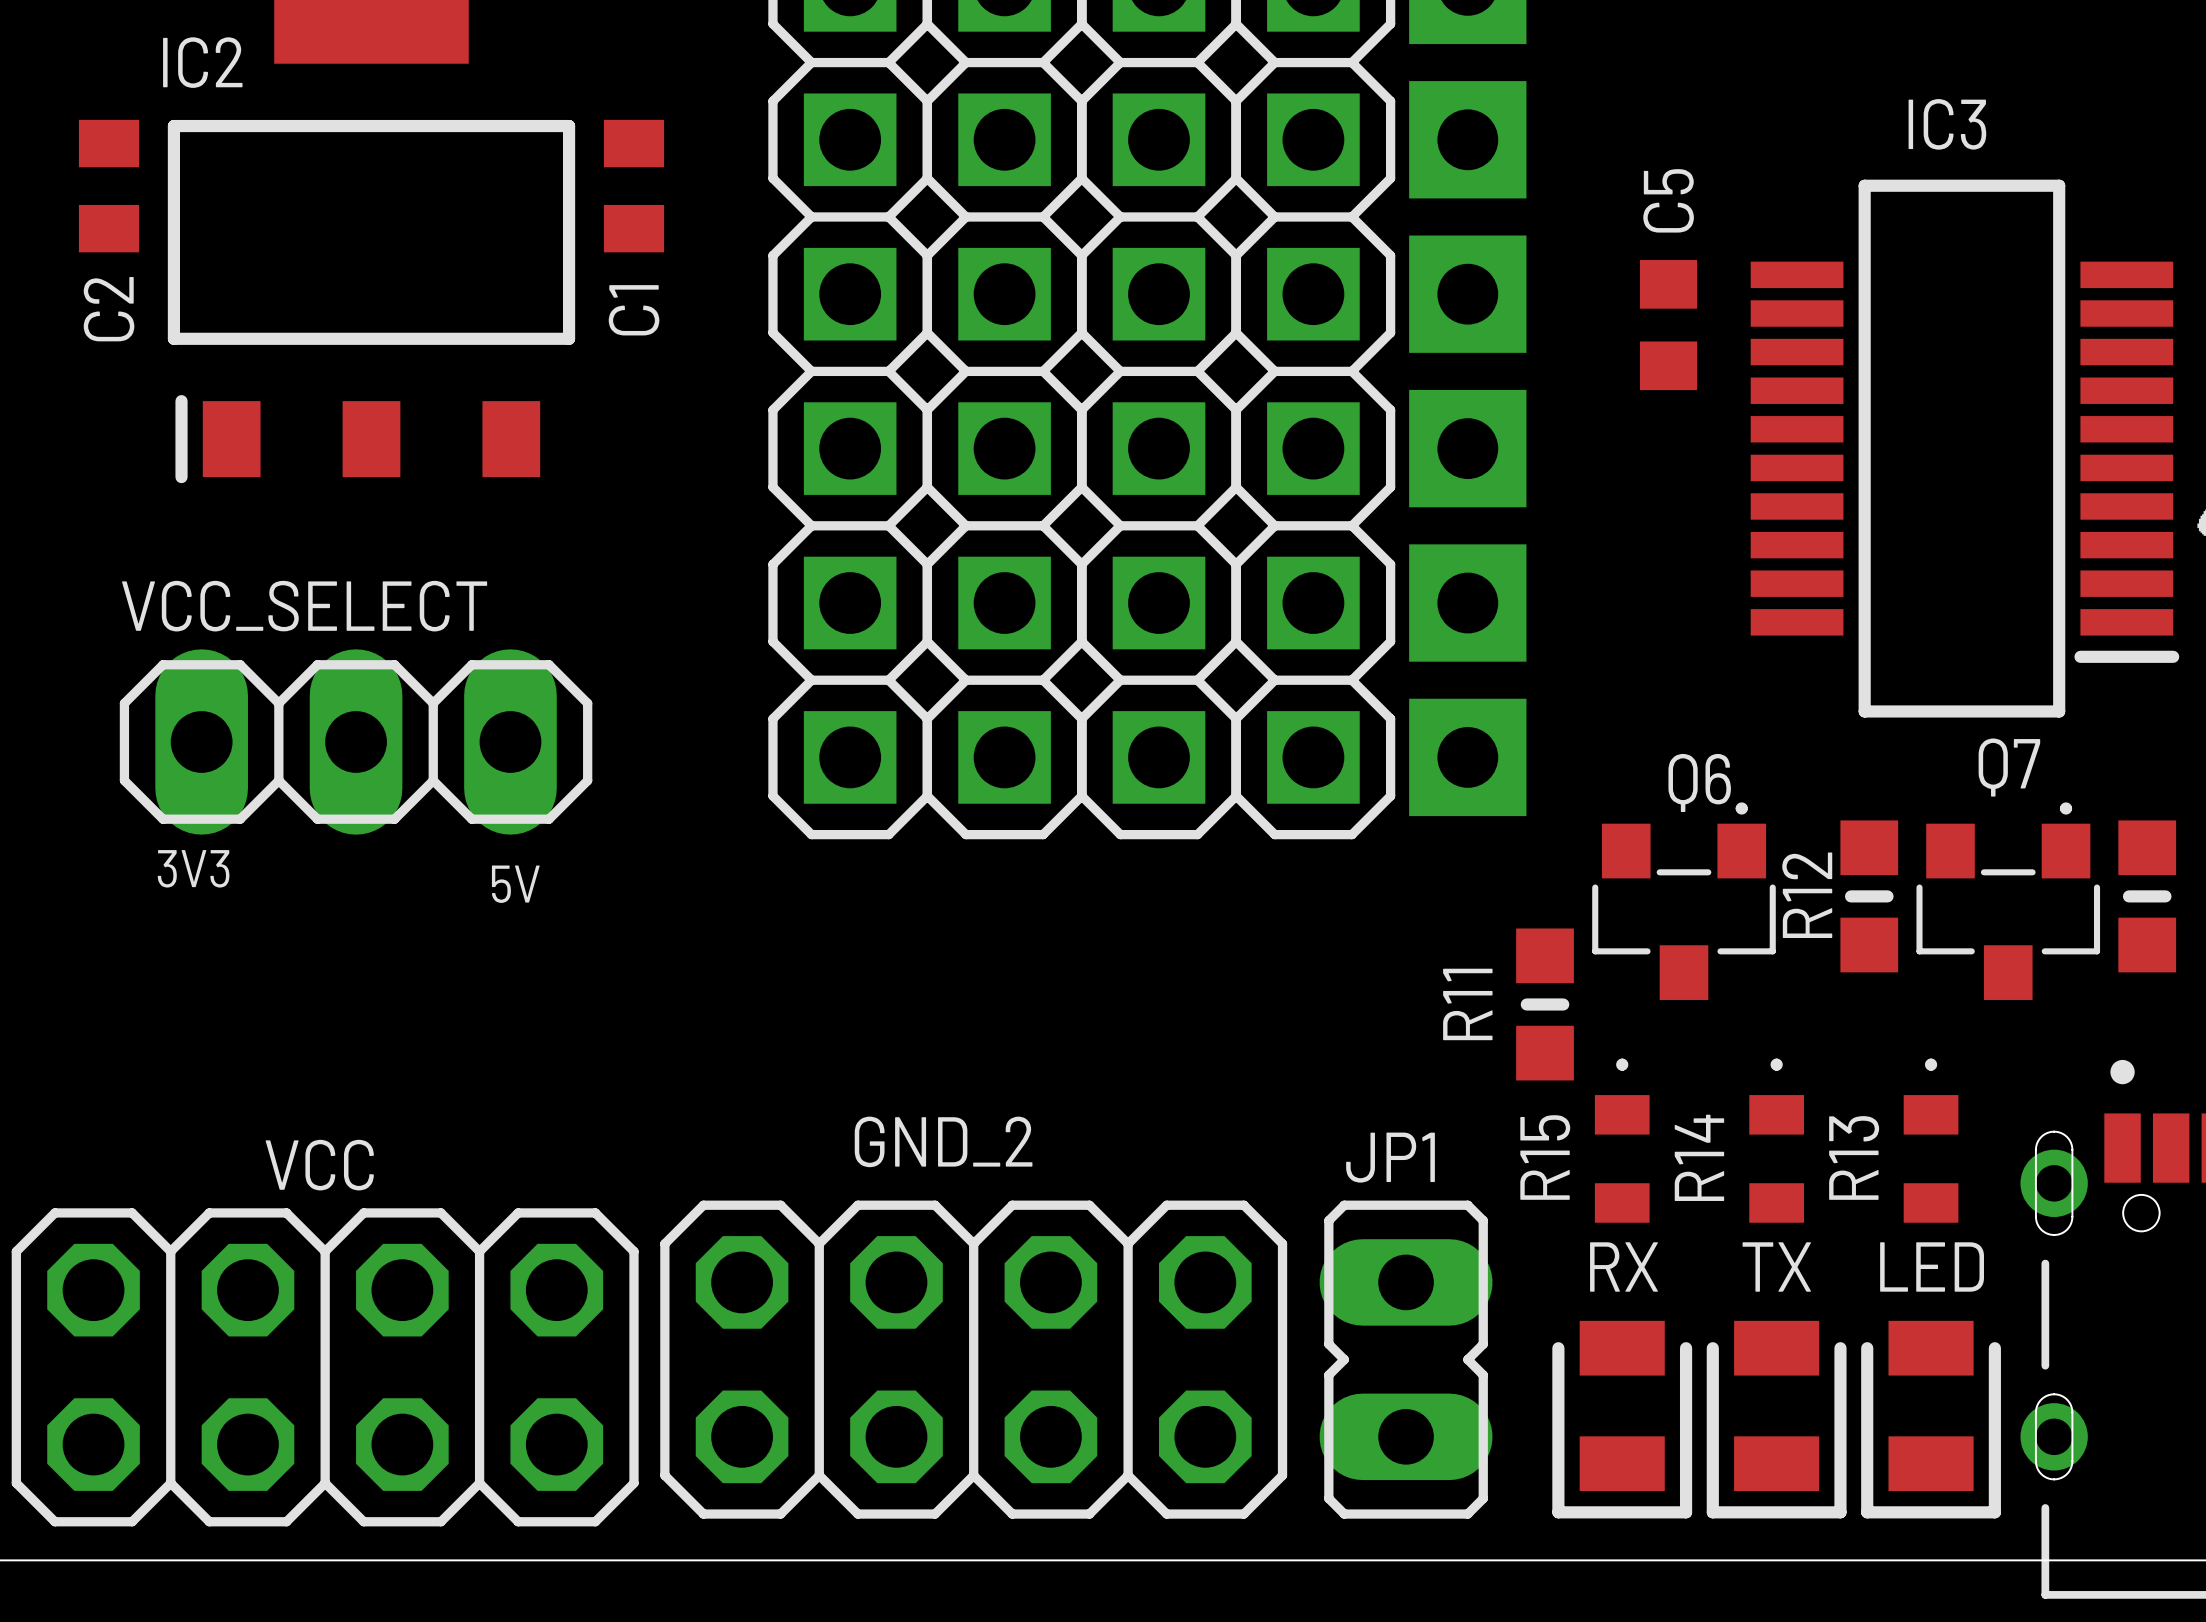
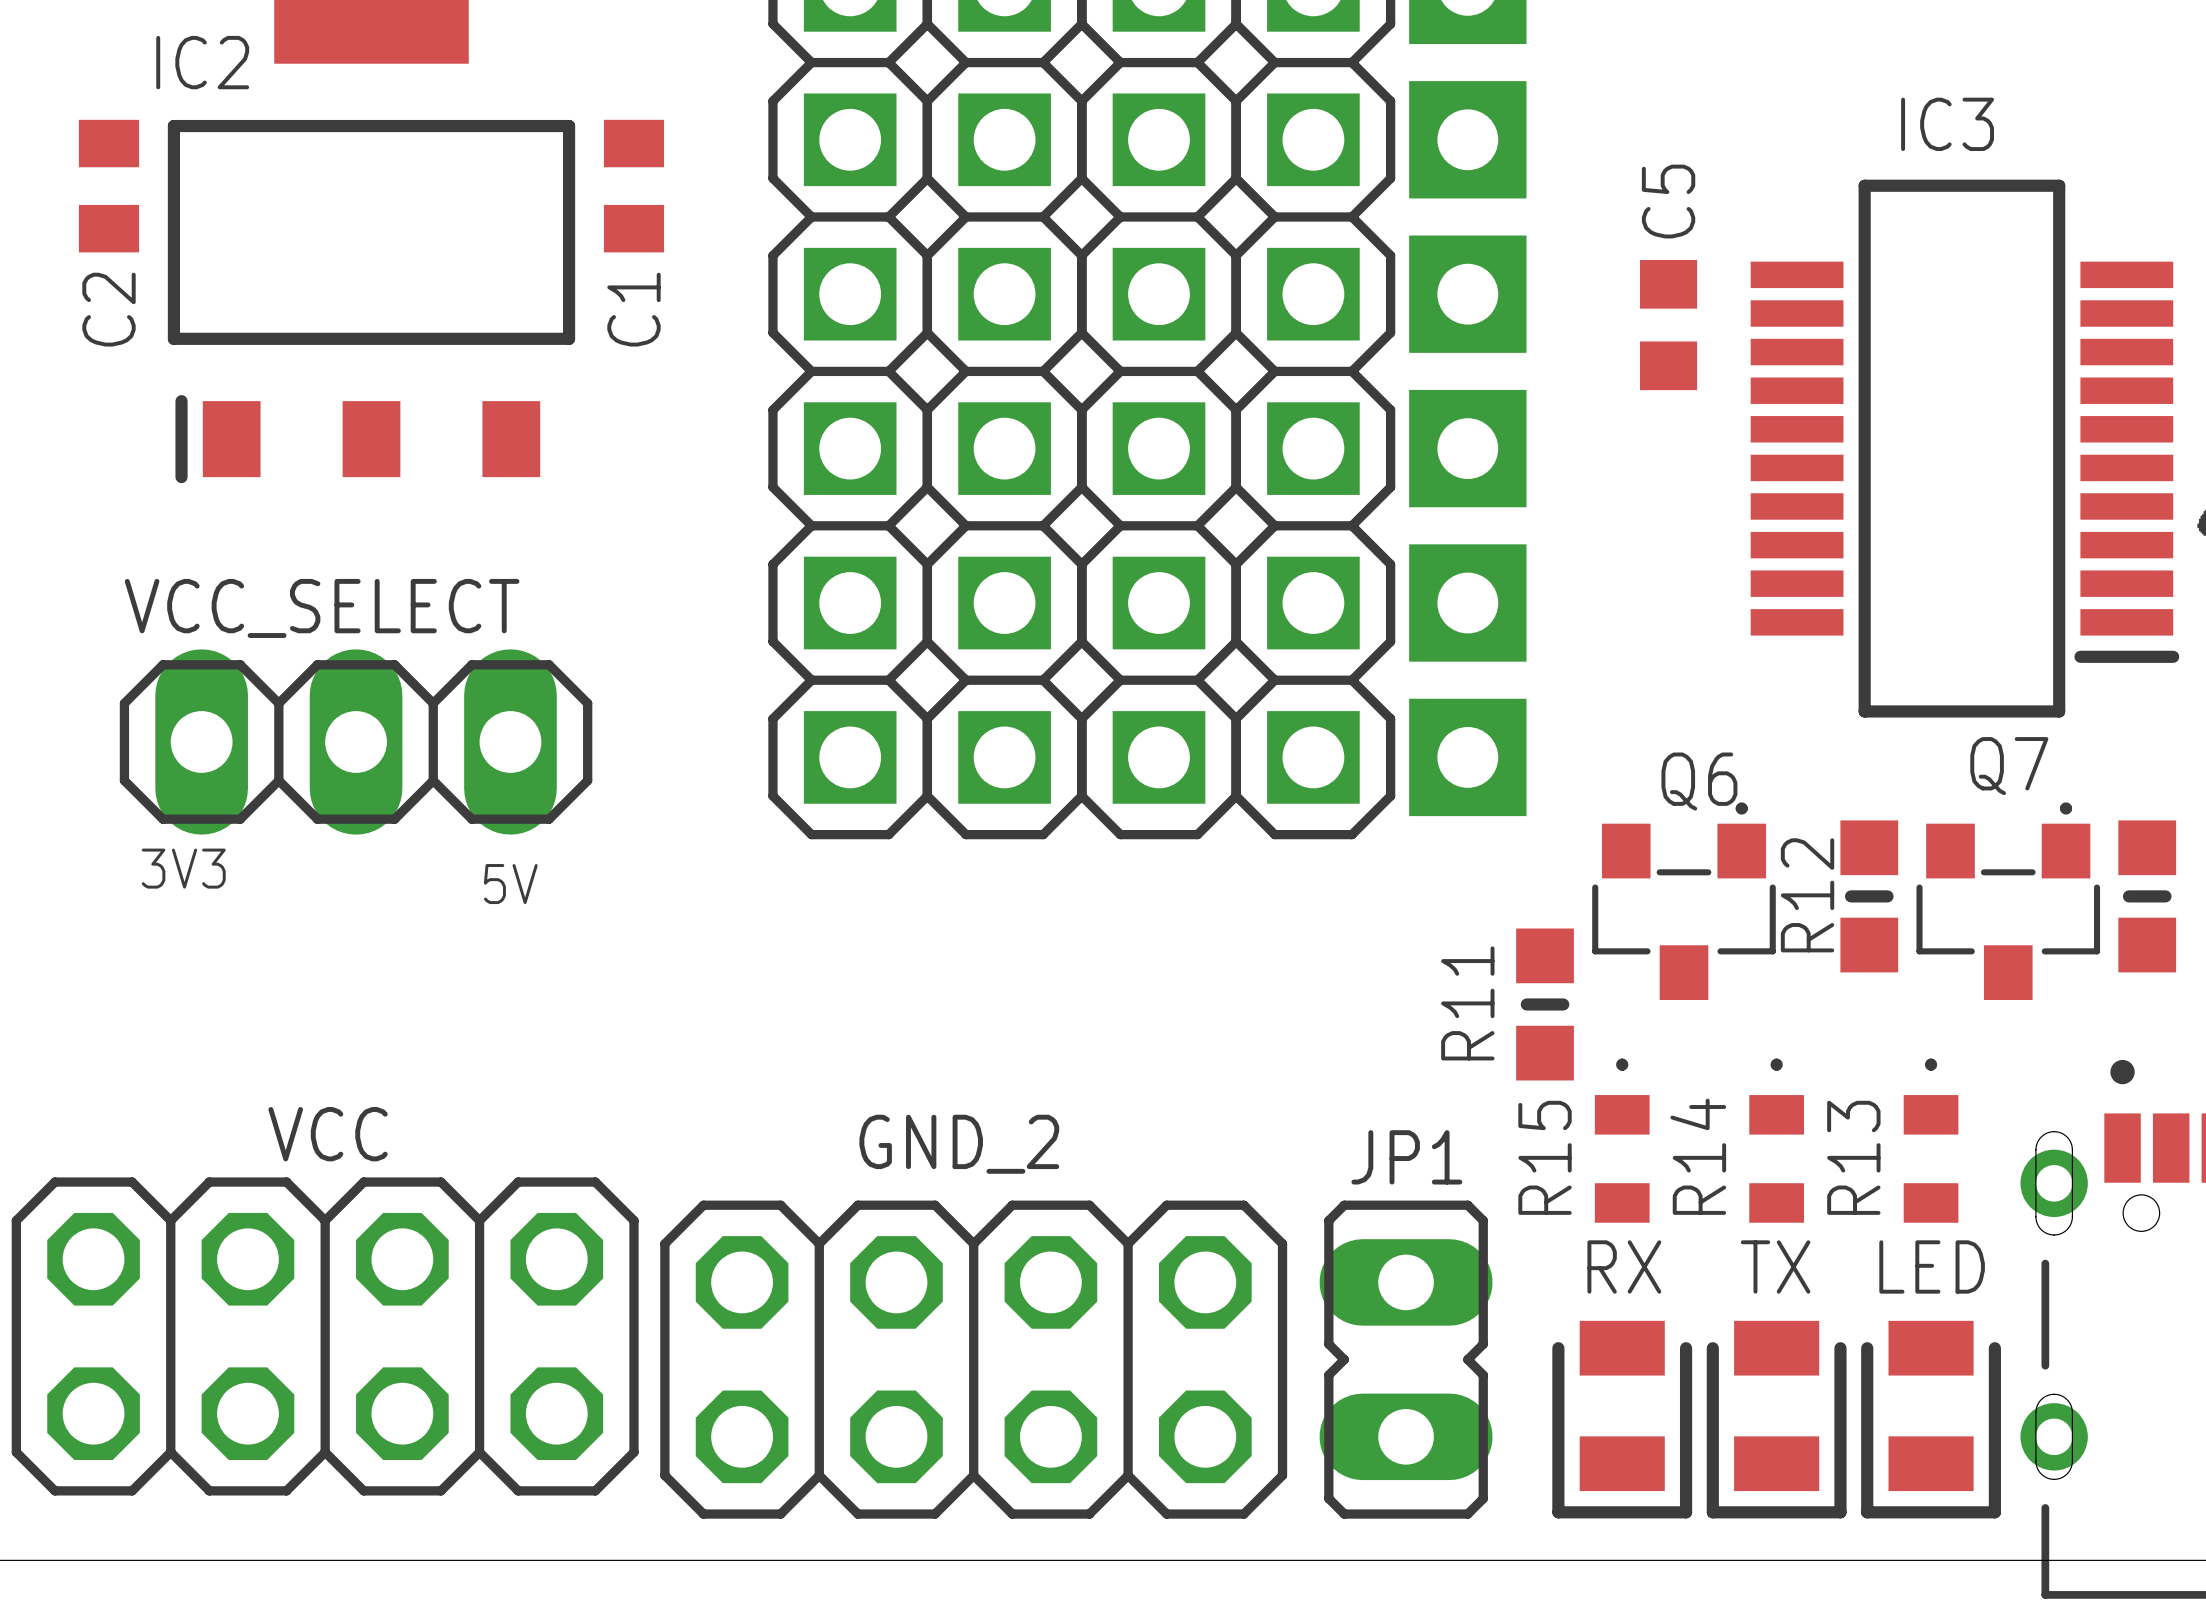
VCC position: (325, 1367) -> (325, 1336)

